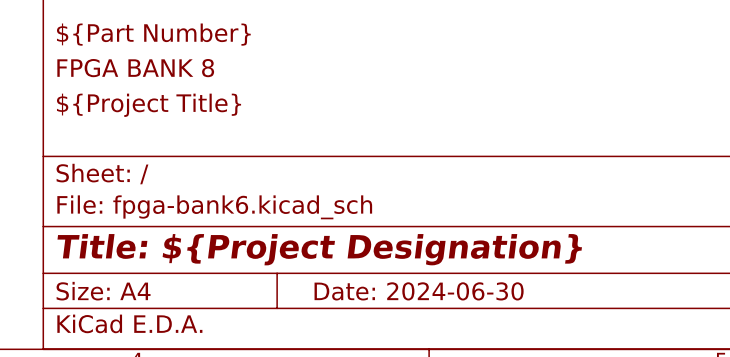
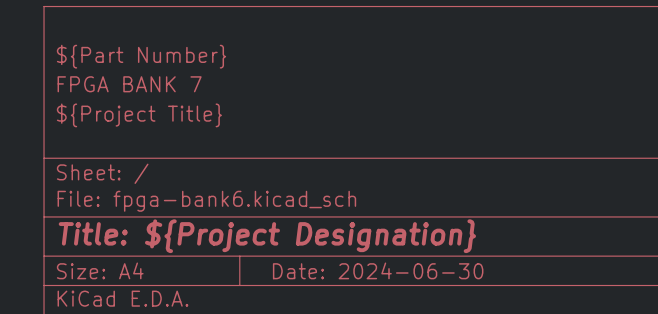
title block: FPGA BANK 8 (135, 68) -> FPGA BANK 7 (129, 84)

